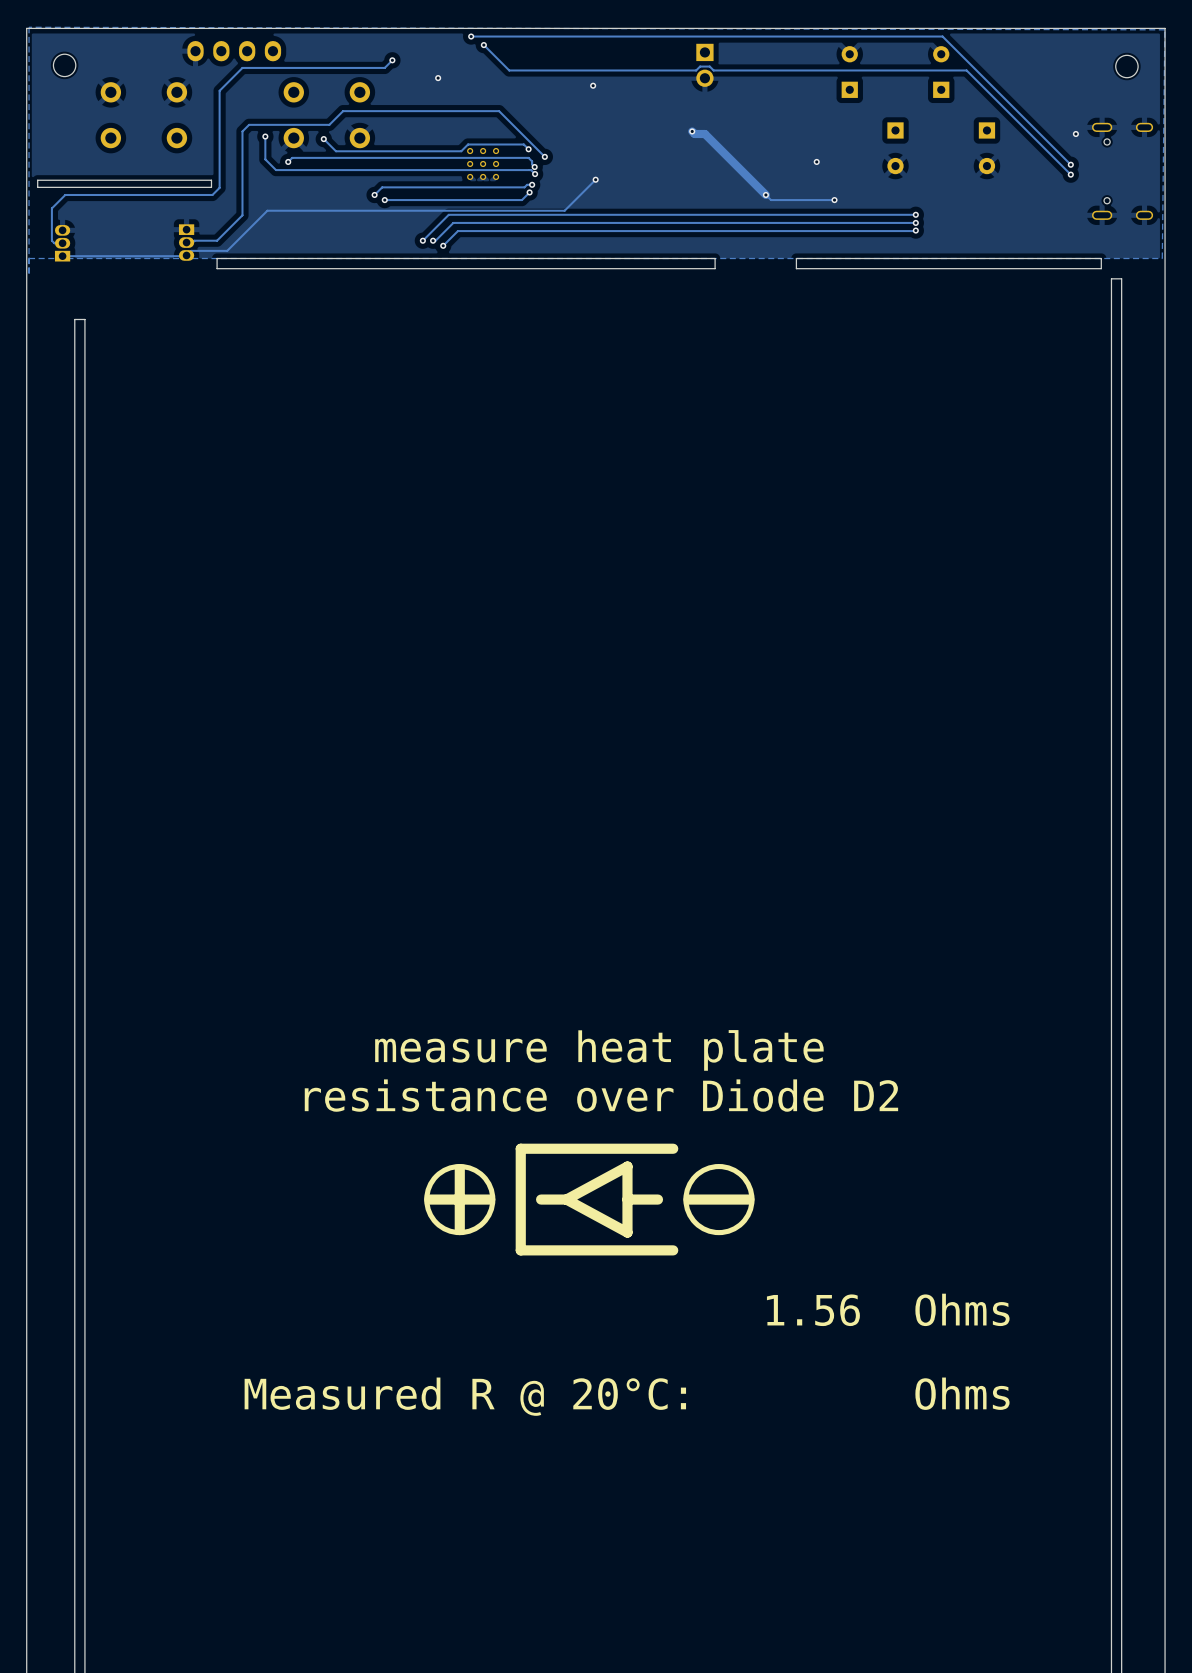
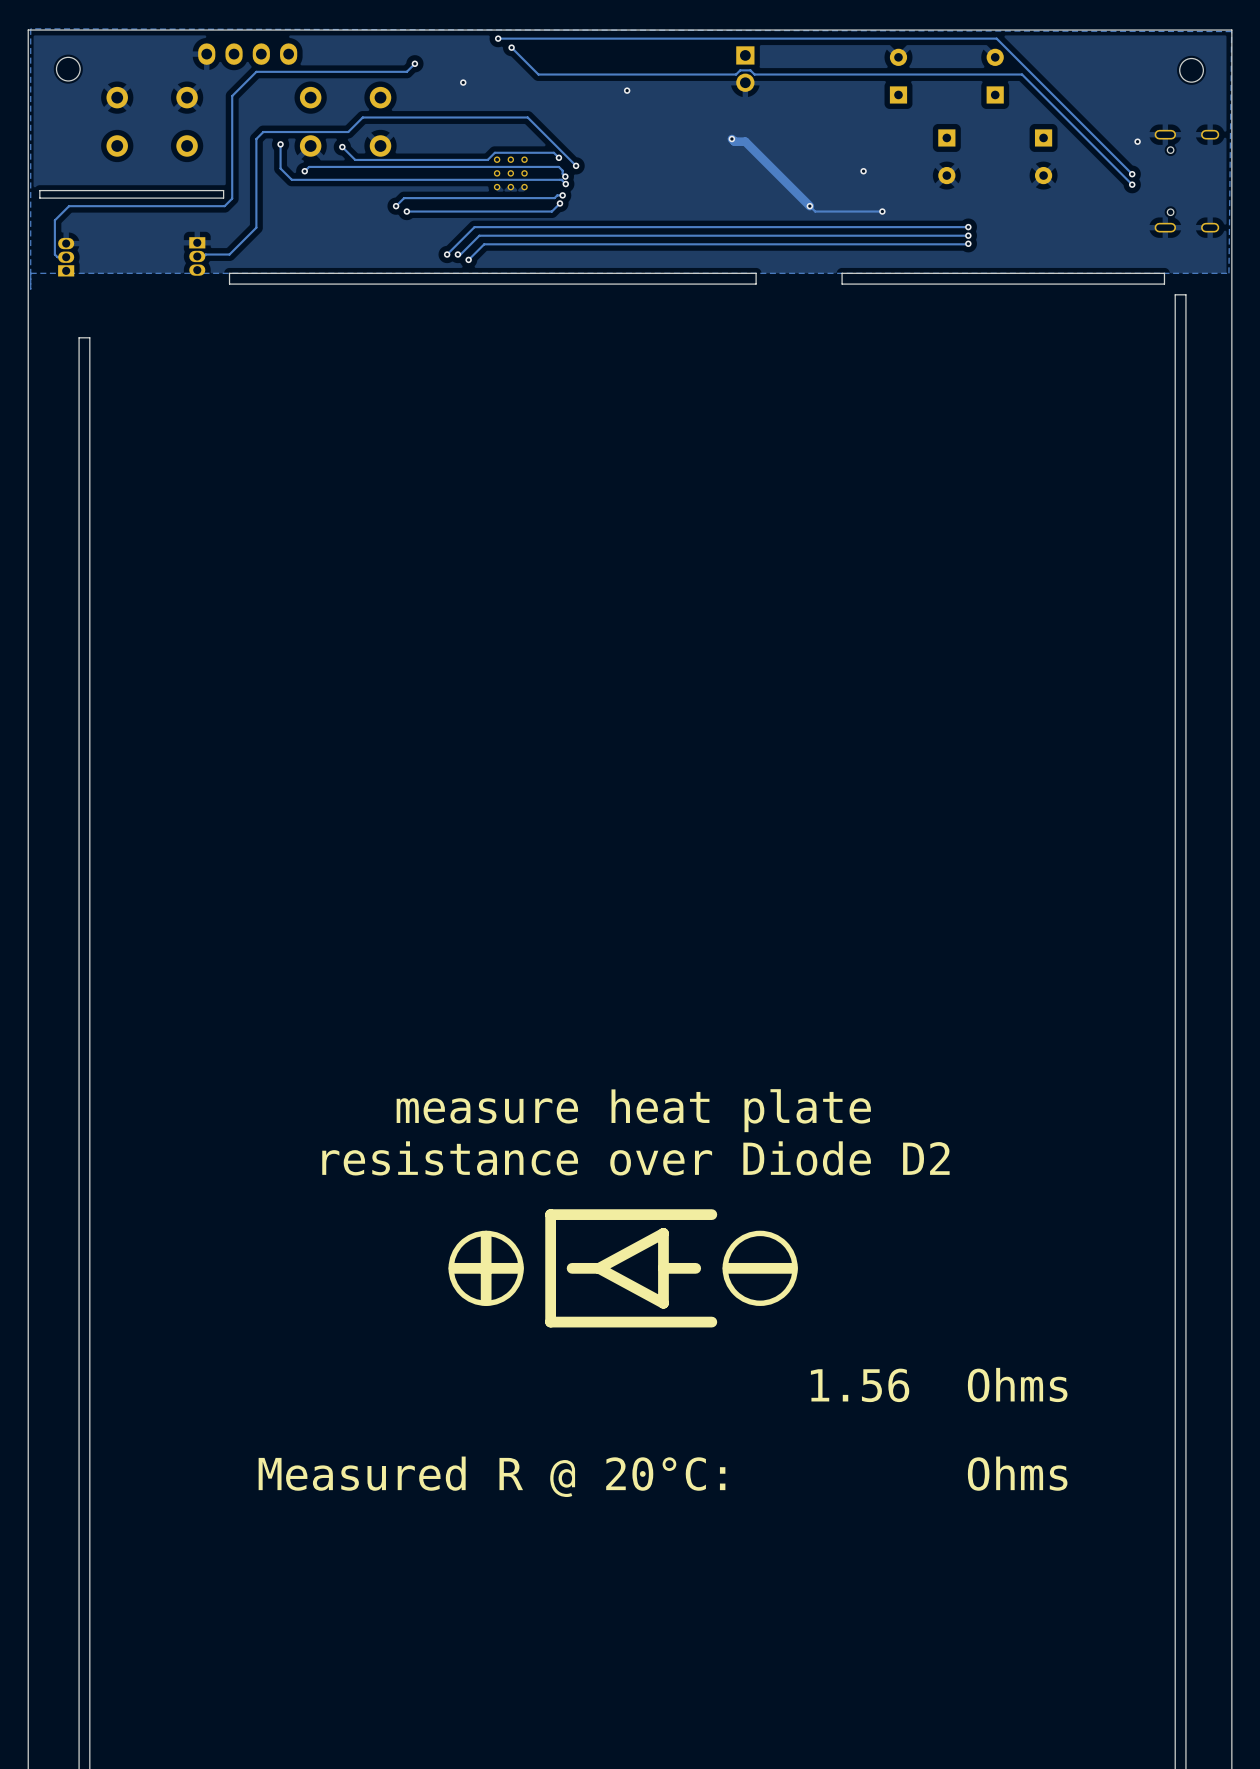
track: (595, 179) (564, 210) (267, 210) (227, 250) (191, 250) (184, 256) (62, 256) -> none
via: (595, 179) -> none

